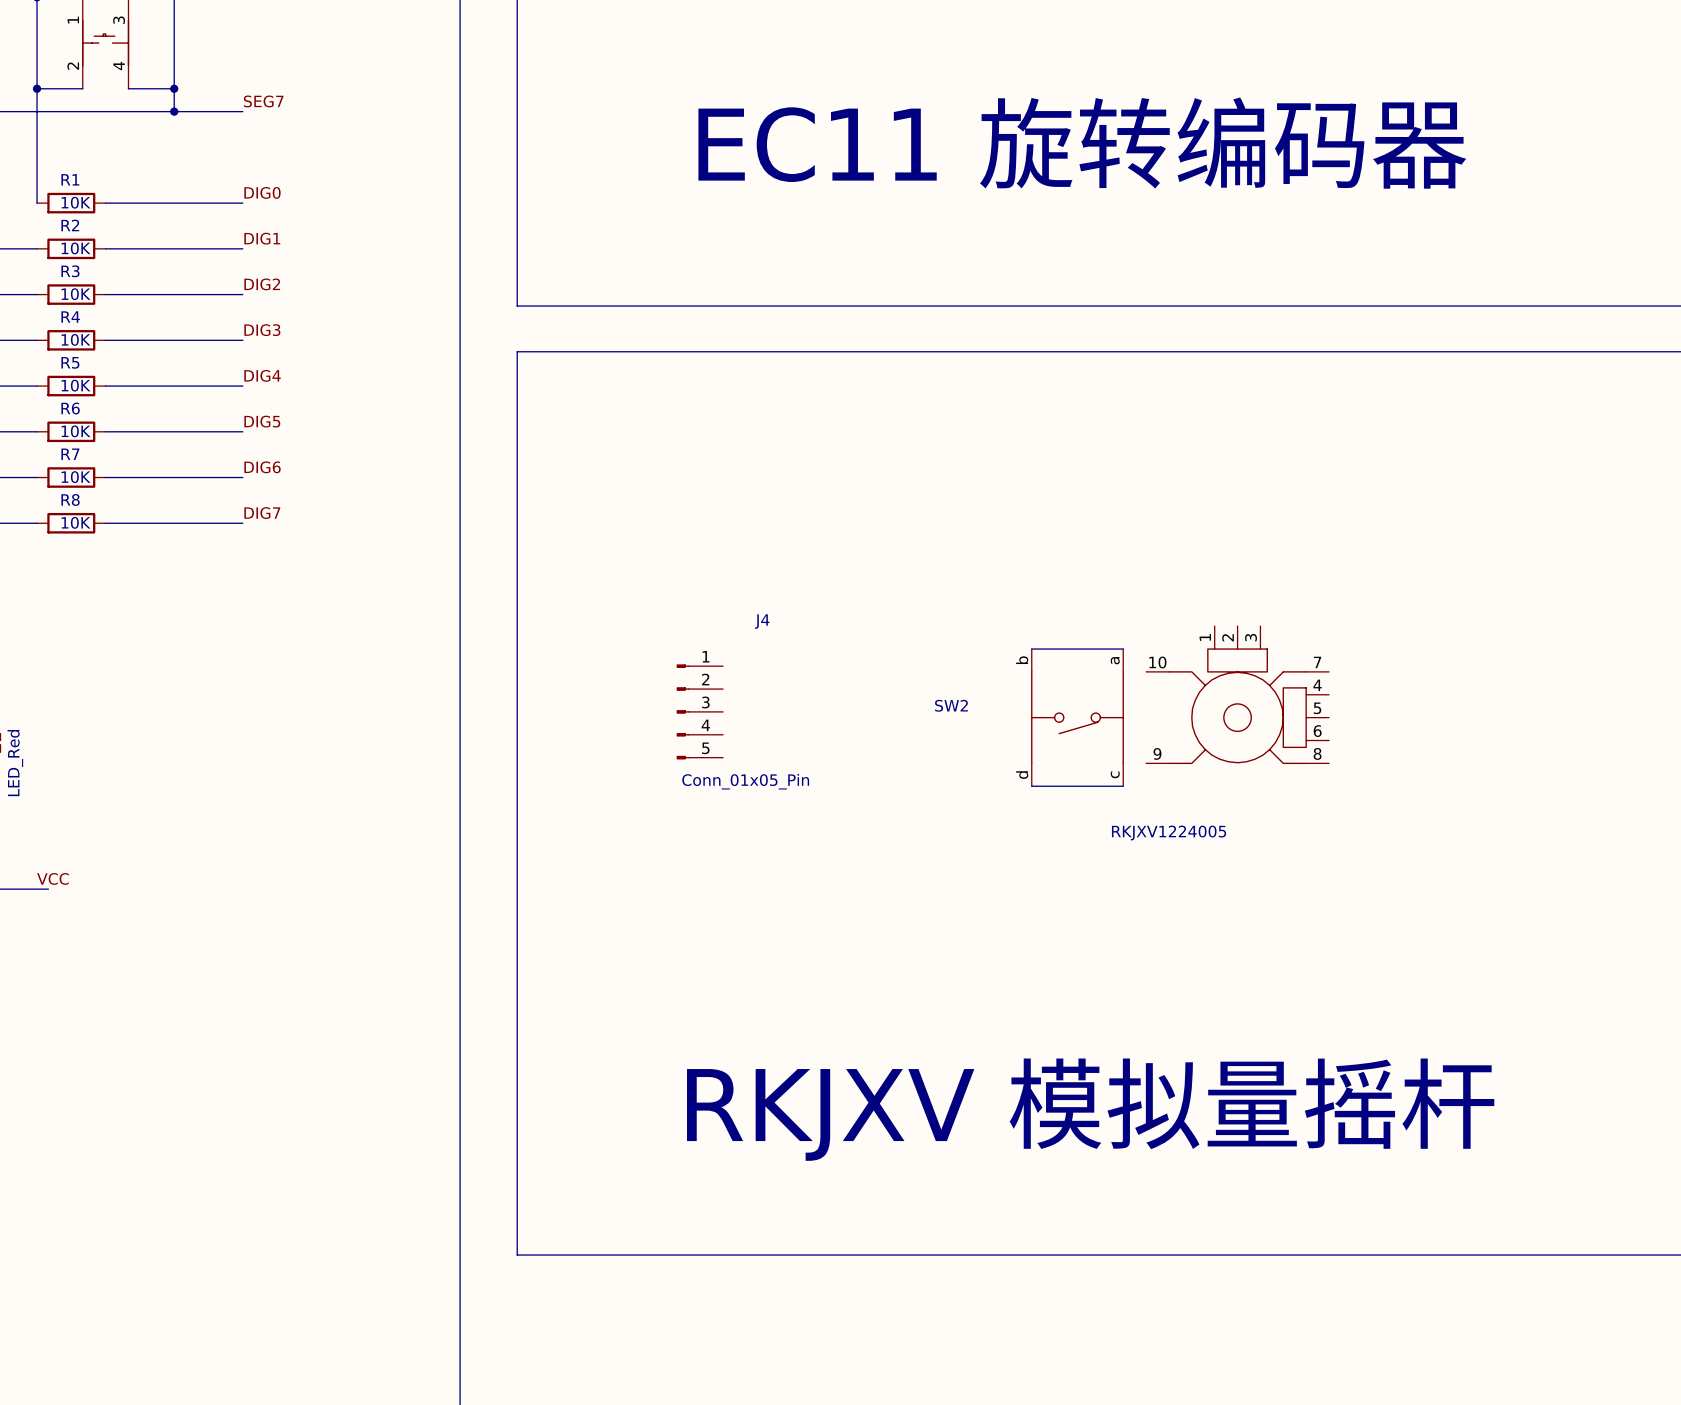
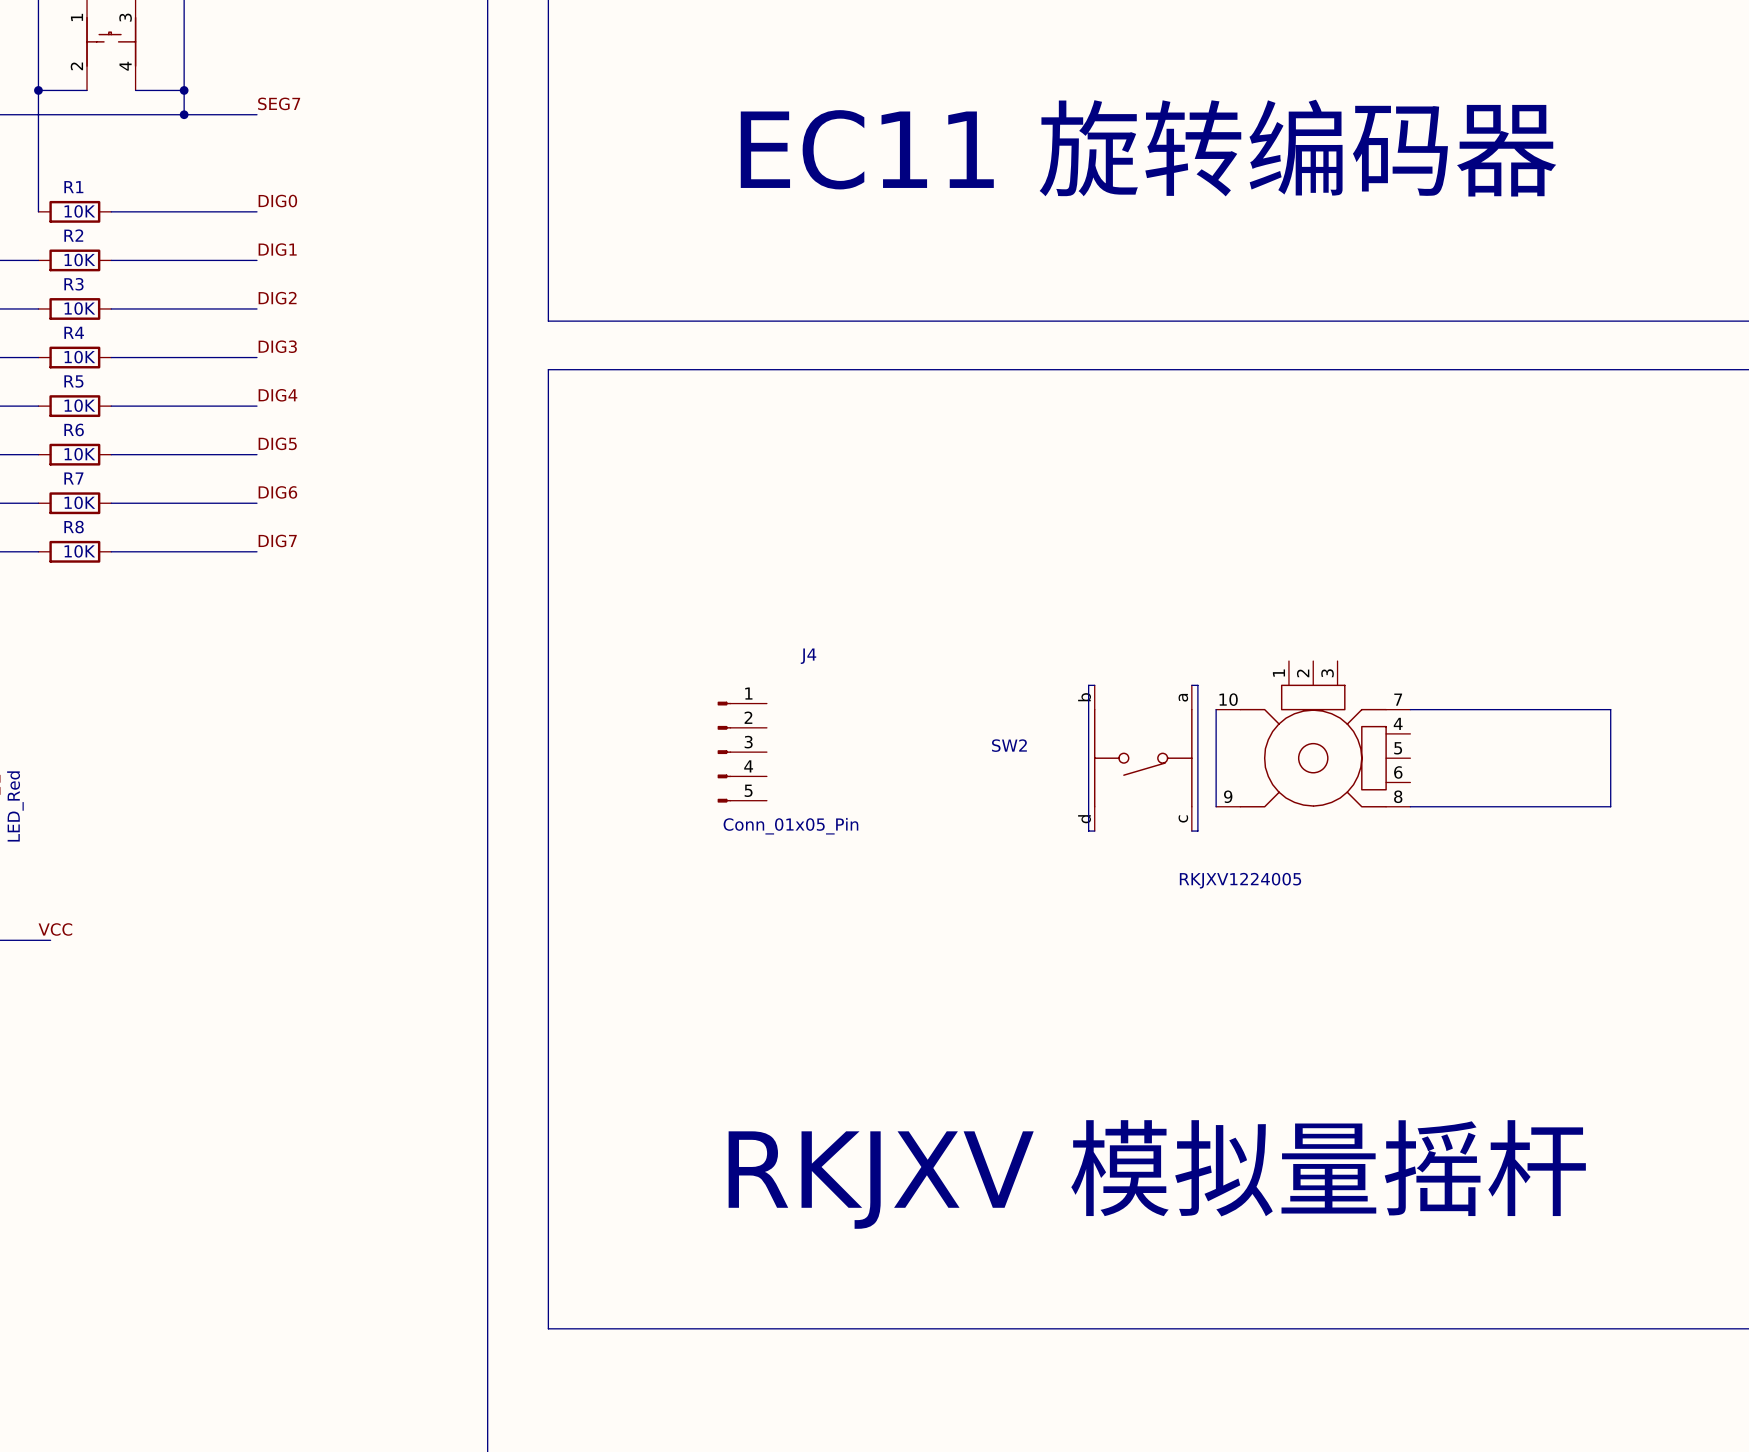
wire: (1031, 649) (1123, 649) -> (1094, 685) (1088, 685) (1088, 831) (1094, 831)
wire: none -> (1216, 709) (1216, 806)
wire: none -> (1410, 709) (1610, 709) (1610, 806) (1410, 806)
wire: (1031, 786) (1123, 786) -> (1191, 685) (1197, 685) (1197, 831) (1191, 831)

